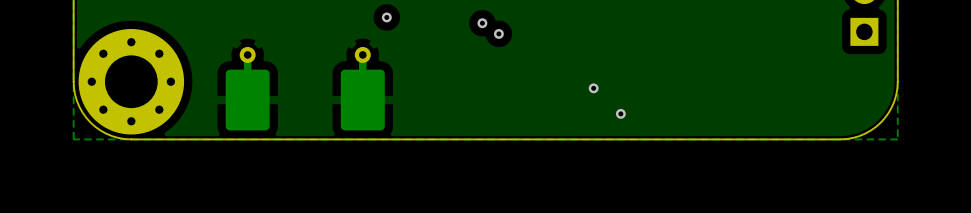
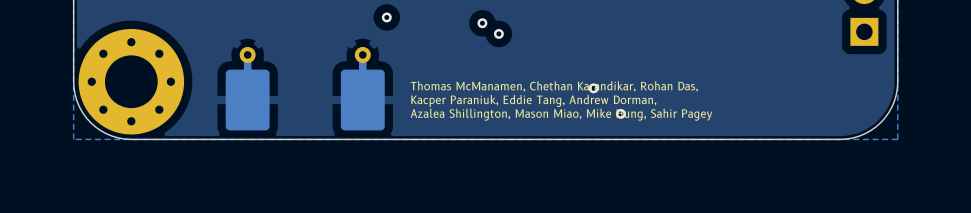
text: none -> Thomas McManamen, Chethan Karandikar, Rohan Das, (554, 86)
text: none -> Kacper Paraniuk, Eddie Tang, Andrew Dorman, (533, 100)
text: none -> Azalea Shillington, Mason Miao, Mike Hung, Sahir Pagey (561, 114)

